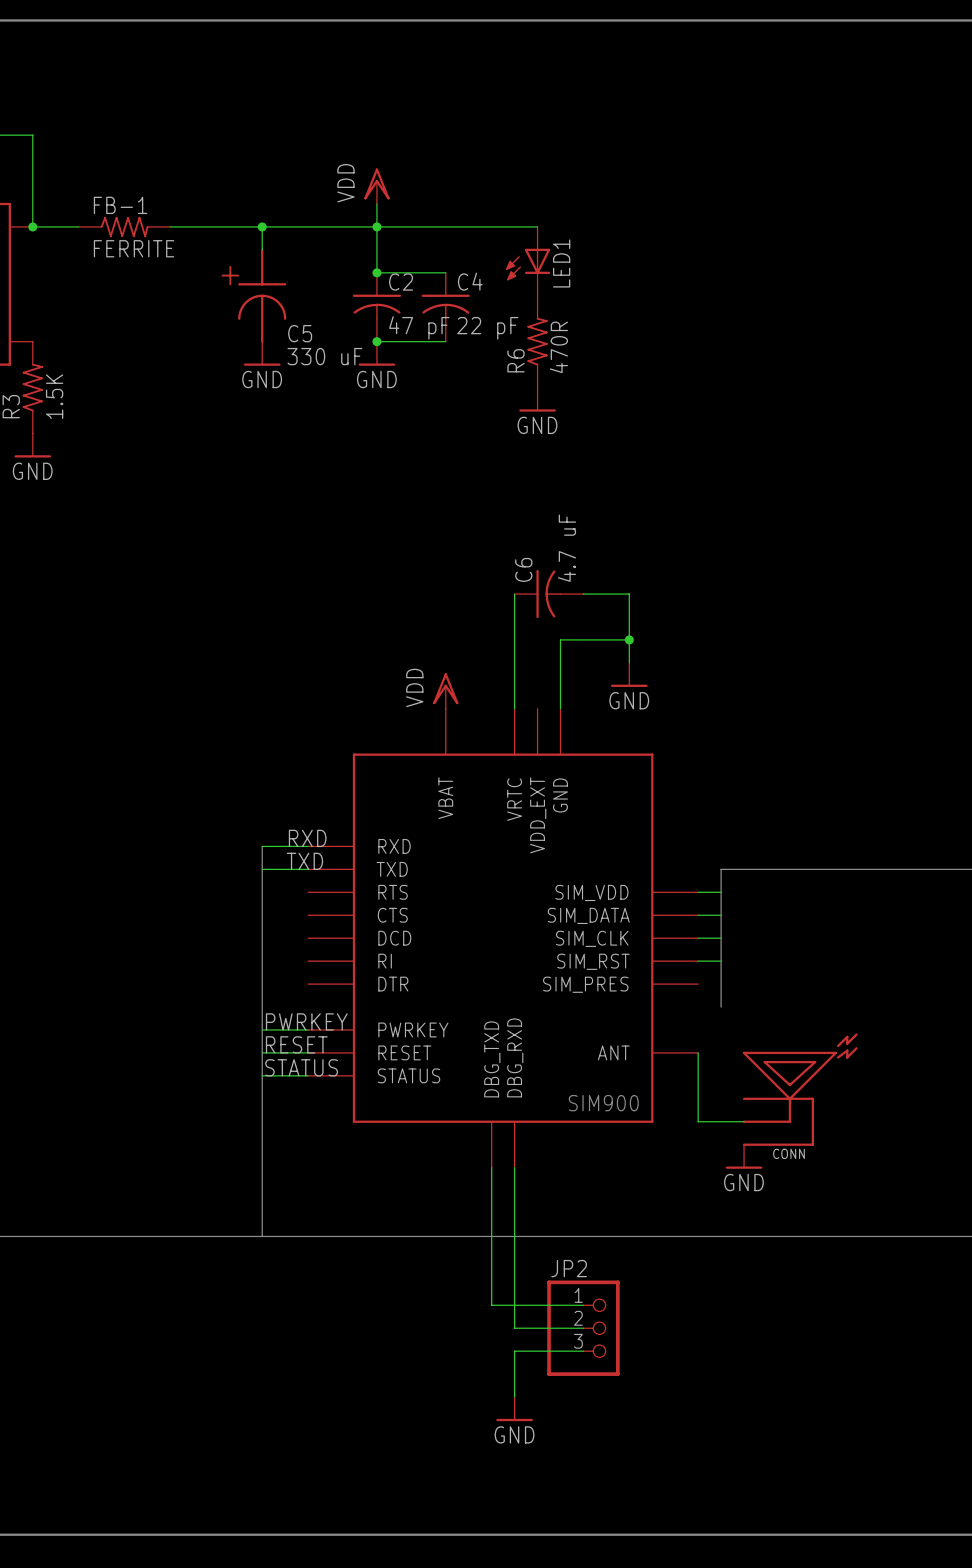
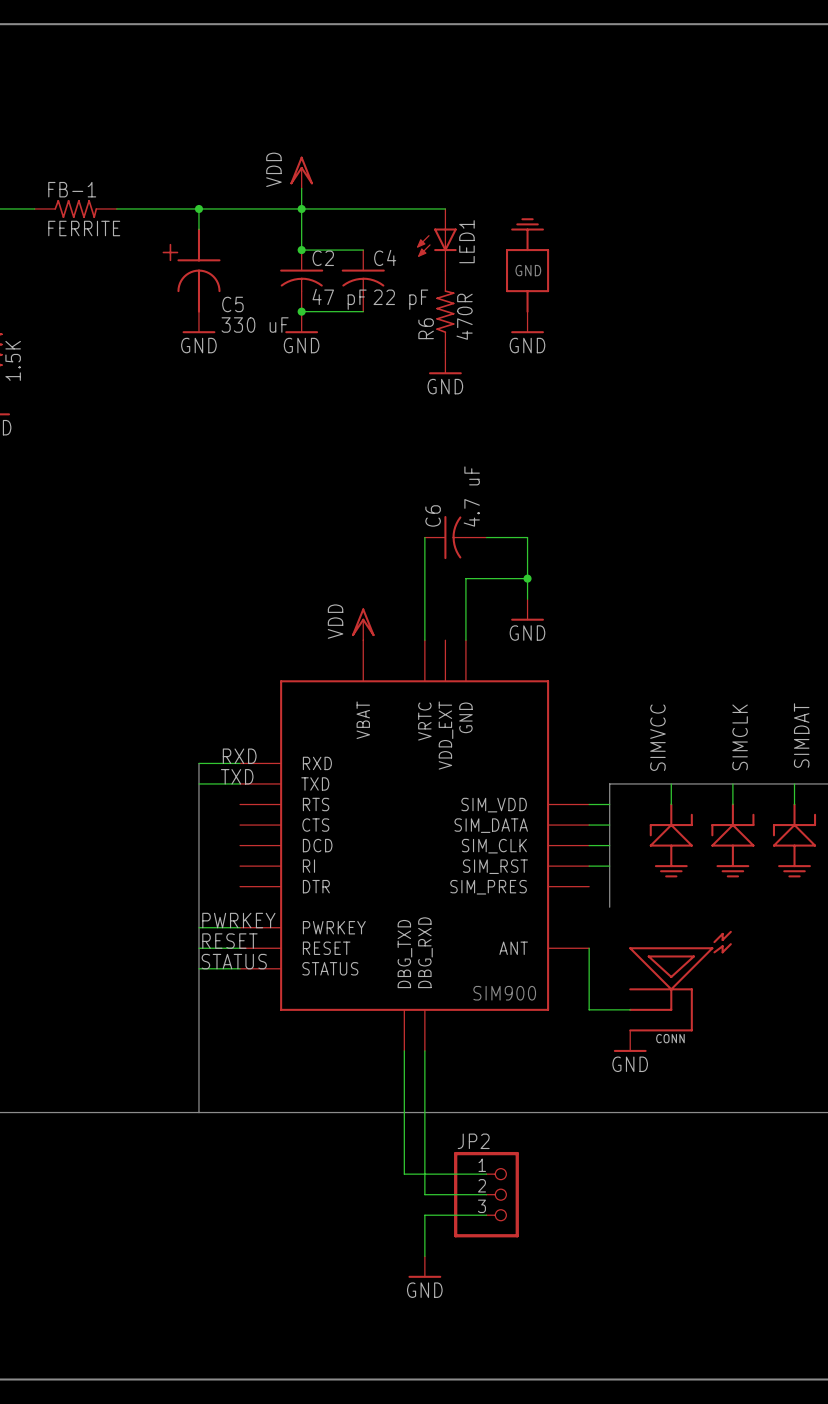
part: none -> (527, 265)
power symbol: none -> GND (527, 322)
label: none -> SIMDAT (801, 735)
label: none -> SIMVCC (657, 737)
label: none -> SIMCLK (740, 737)
wire: none -> (671, 783) (671, 804)
wire: none -> (732, 783) (732, 804)
wire: none -> (794, 783) (794, 804)
part: none -> (671, 840)
part: none -> (732, 840)
part: none -> (794, 840)

